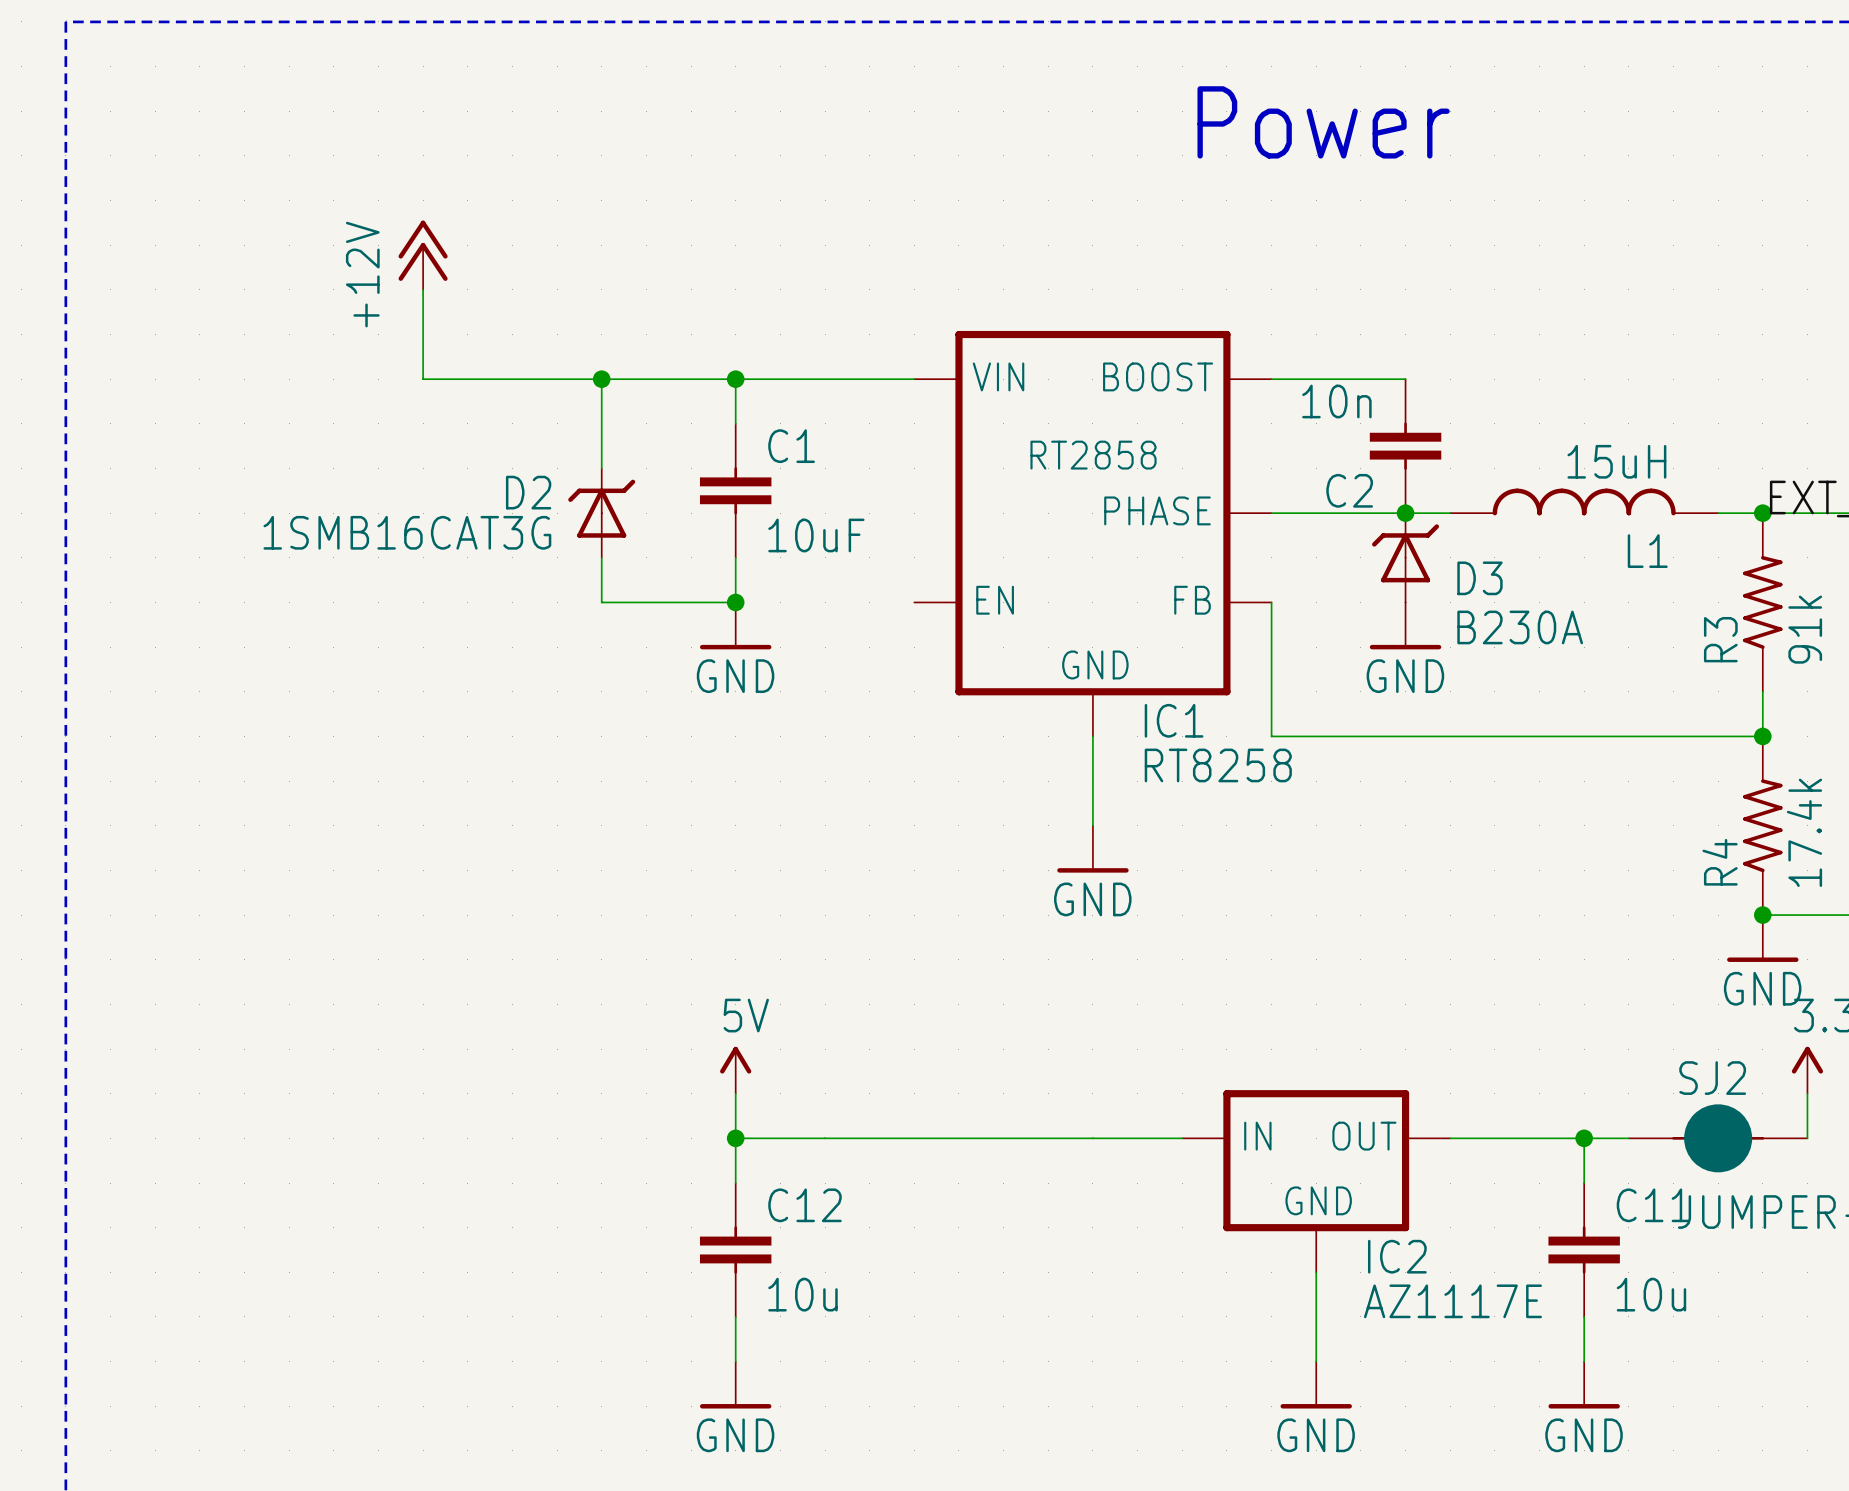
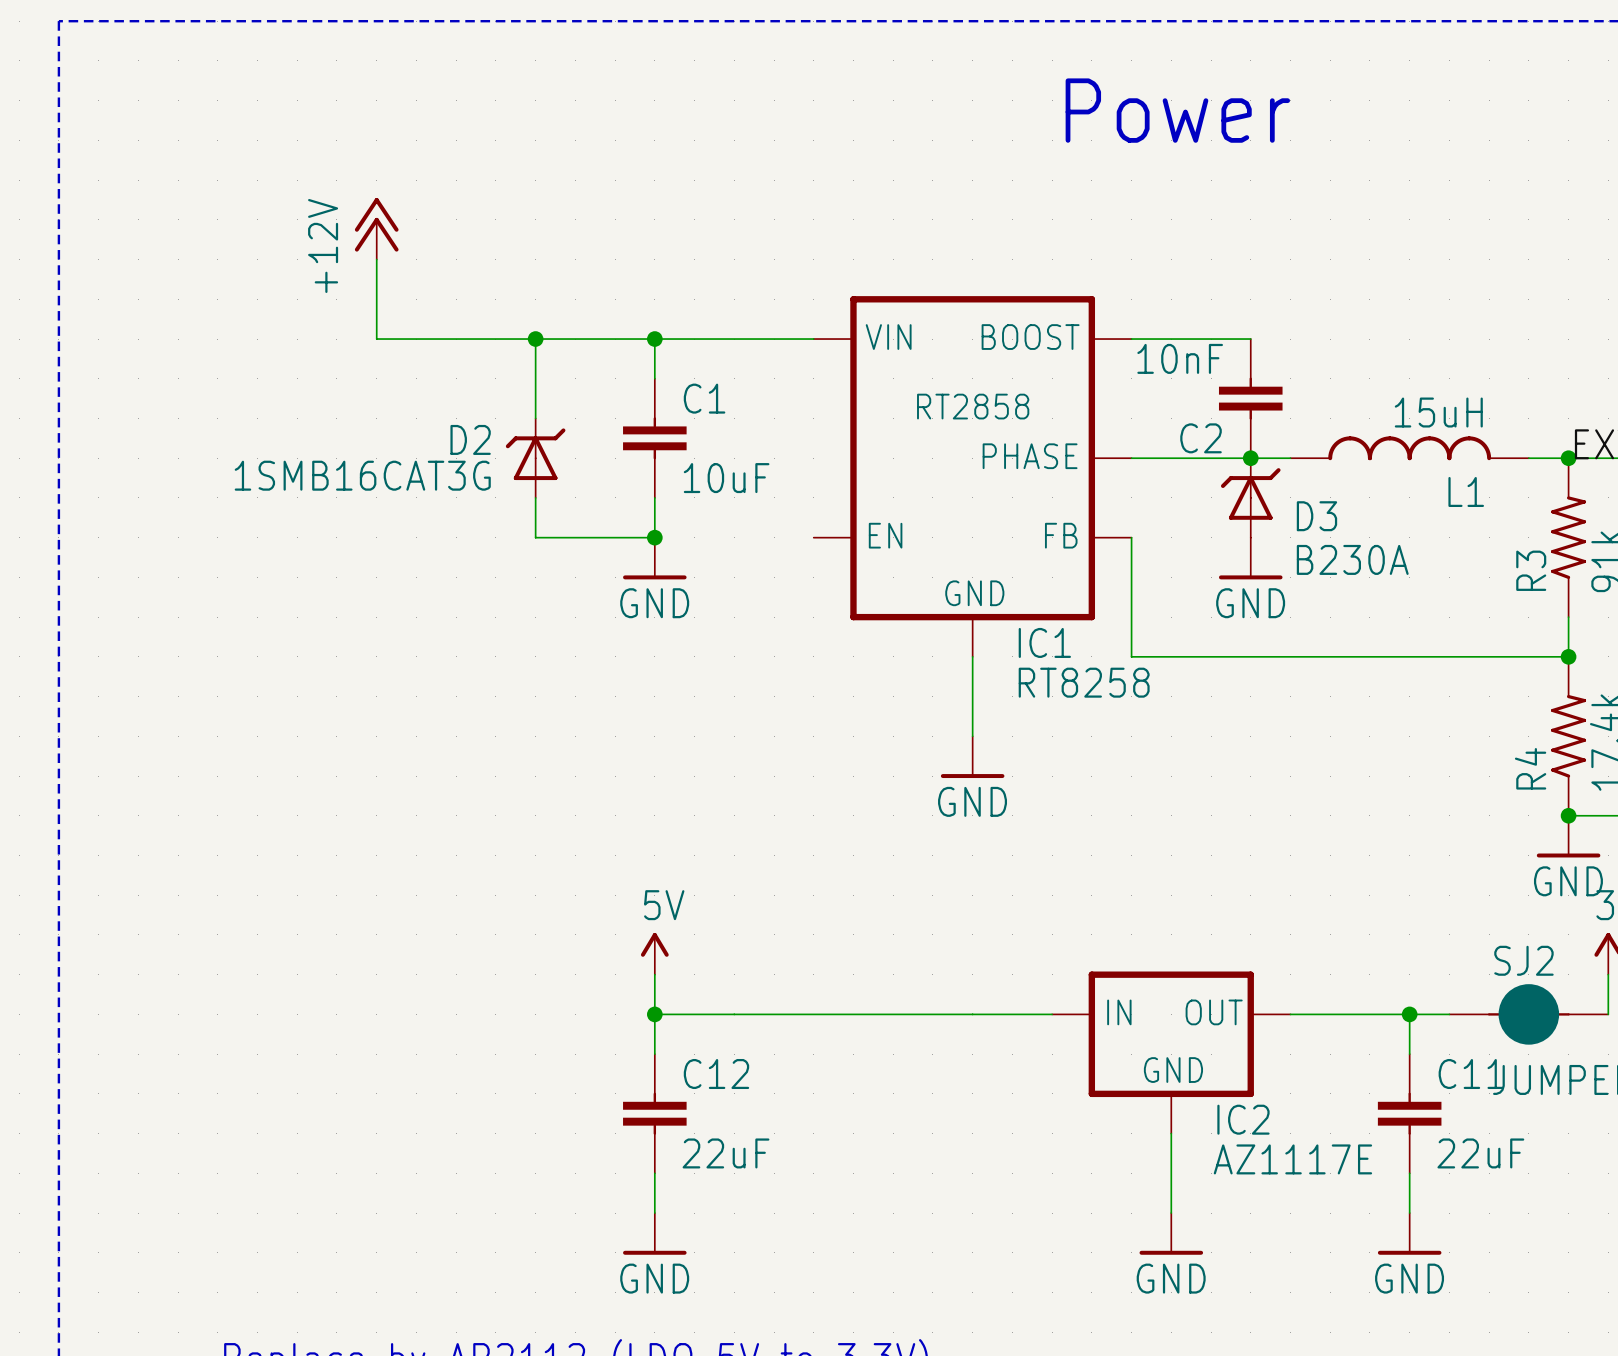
C2 value: 10n (1336, 401) -> 10nF (1180, 358)
C12 value: 10u (802, 1294) -> 22uF (726, 1153)
C11 value: 10u (1651, 1294) -> 22uF (1480, 1153)

